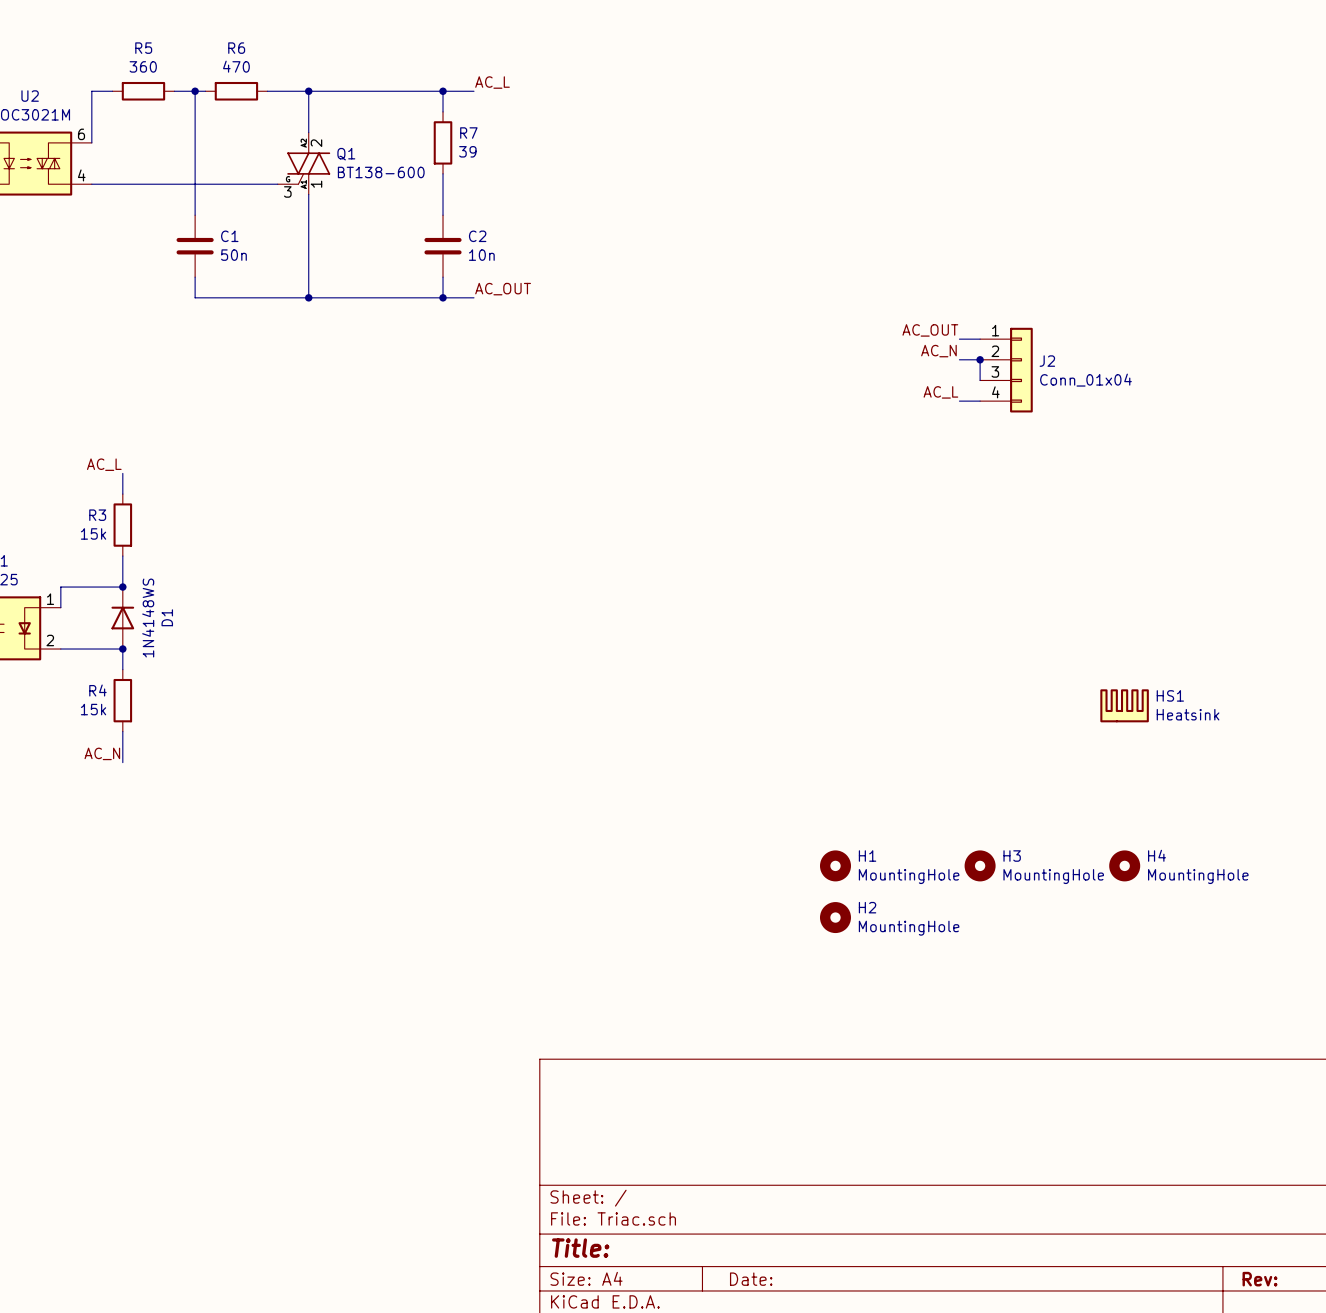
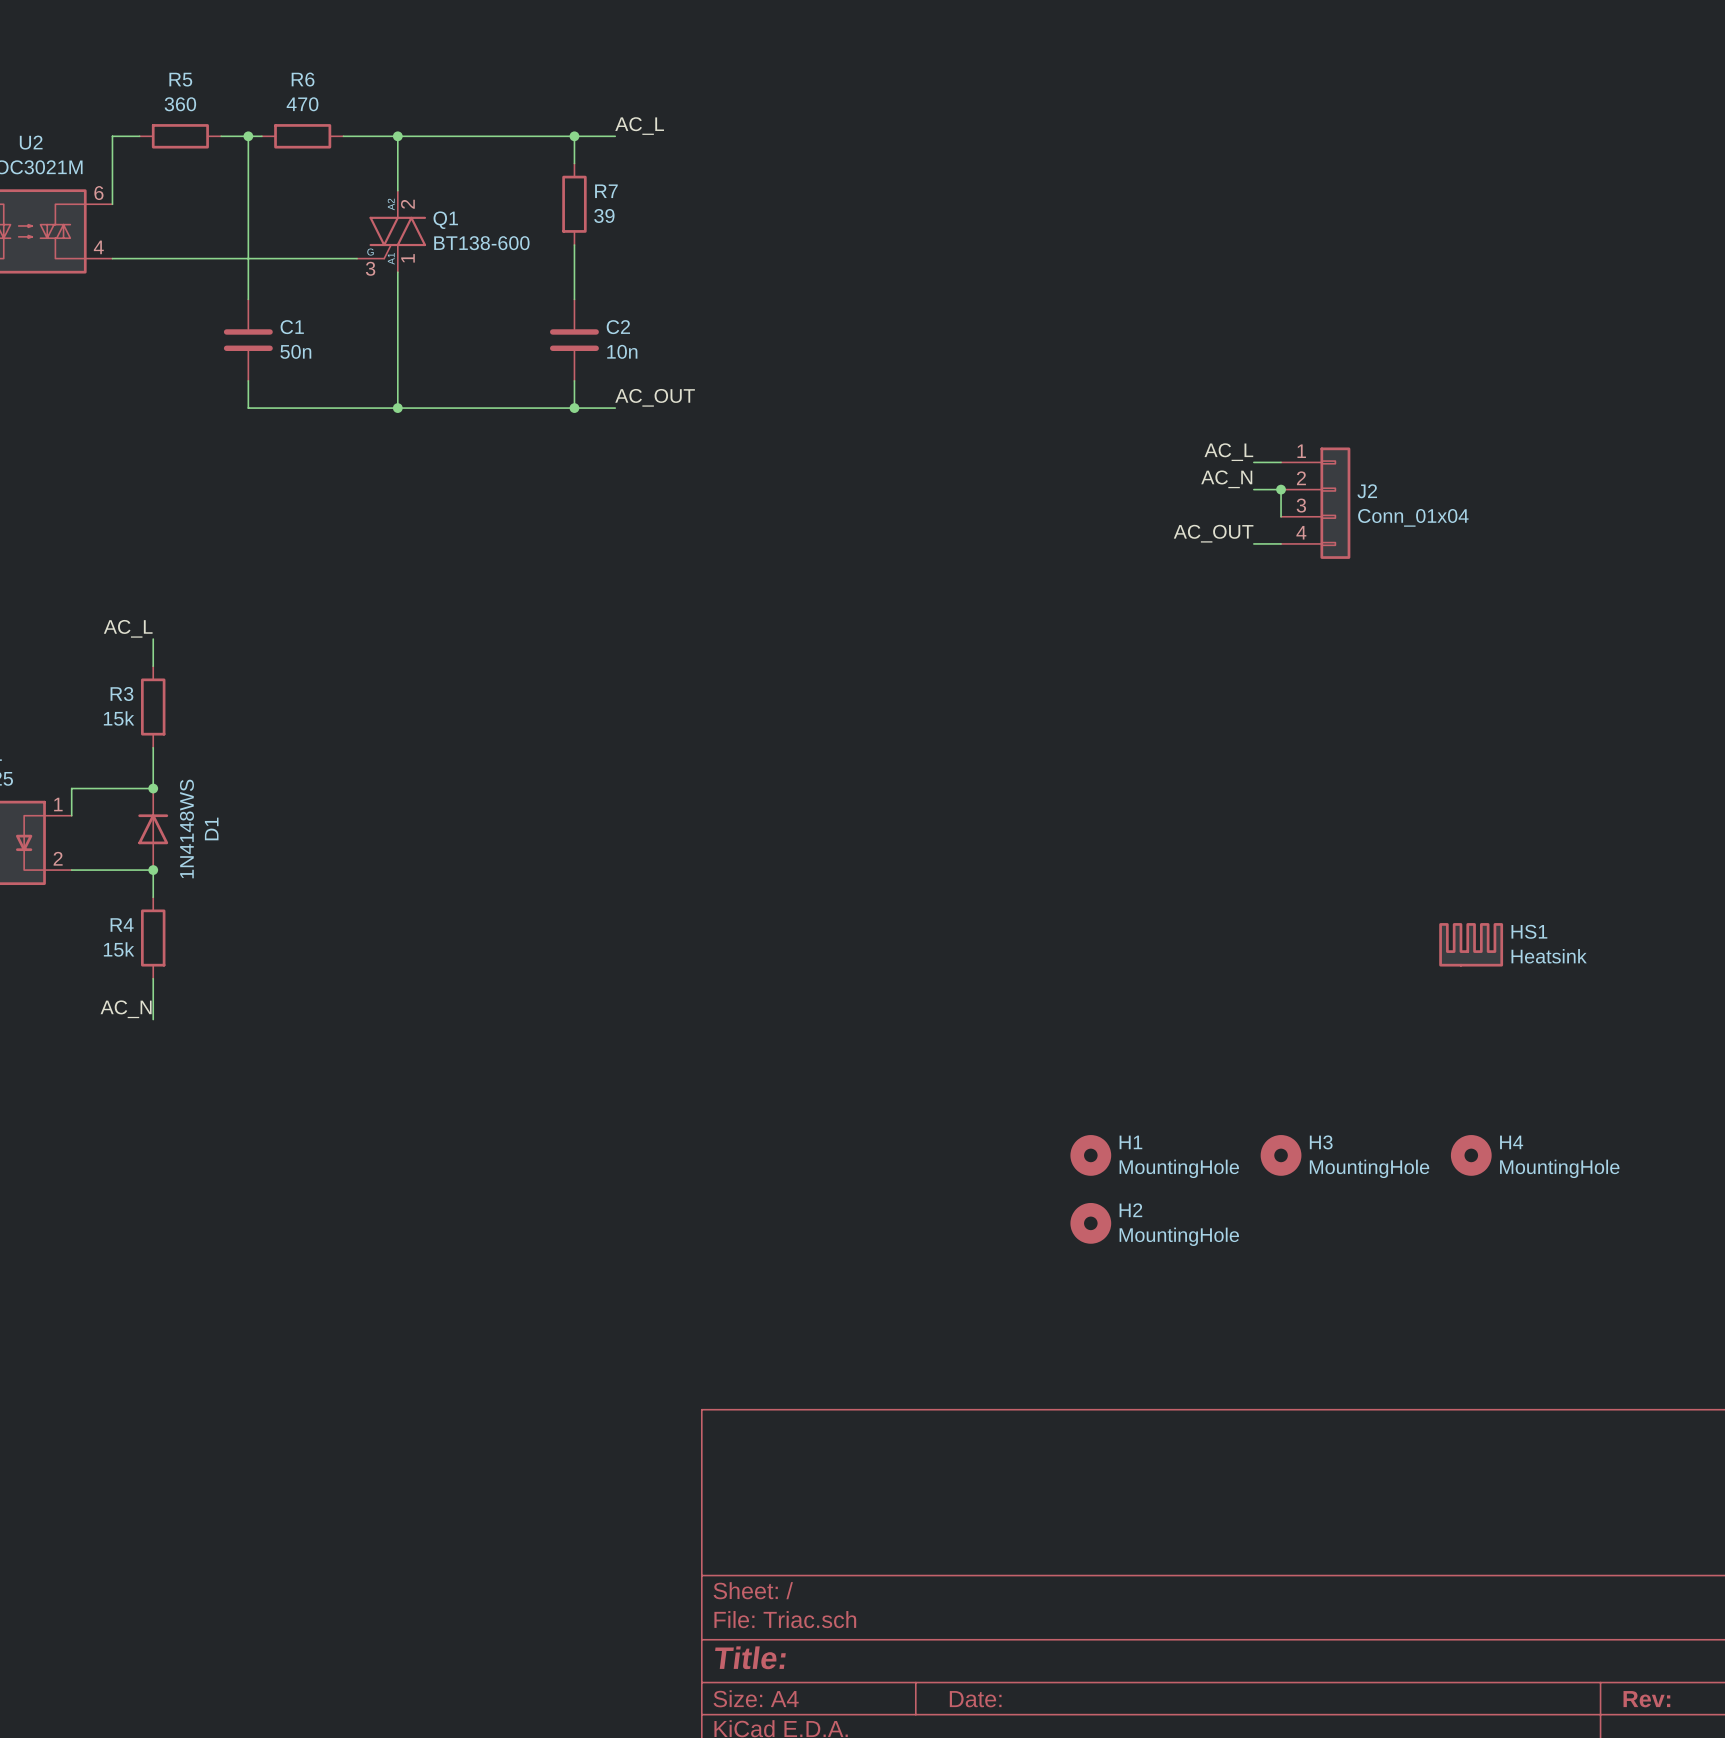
label: AC_OUT (930, 330) -> AC_L (1228, 452)
label: AC_L (940, 392) -> AC_OUT (1213, 533)

